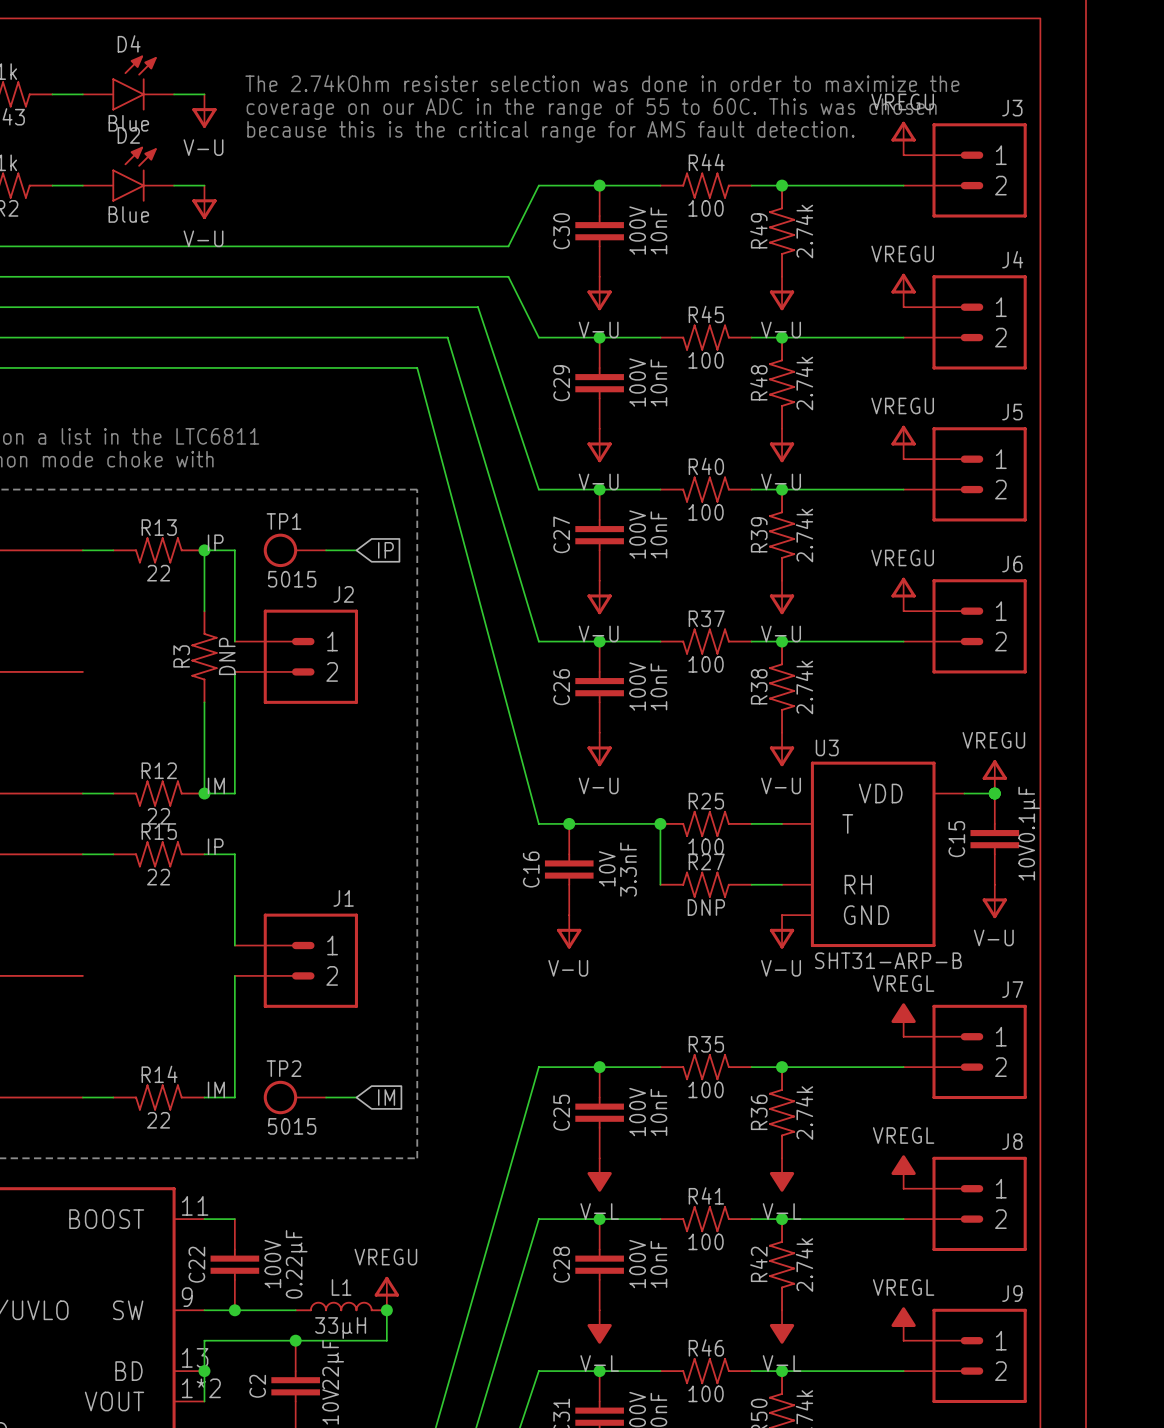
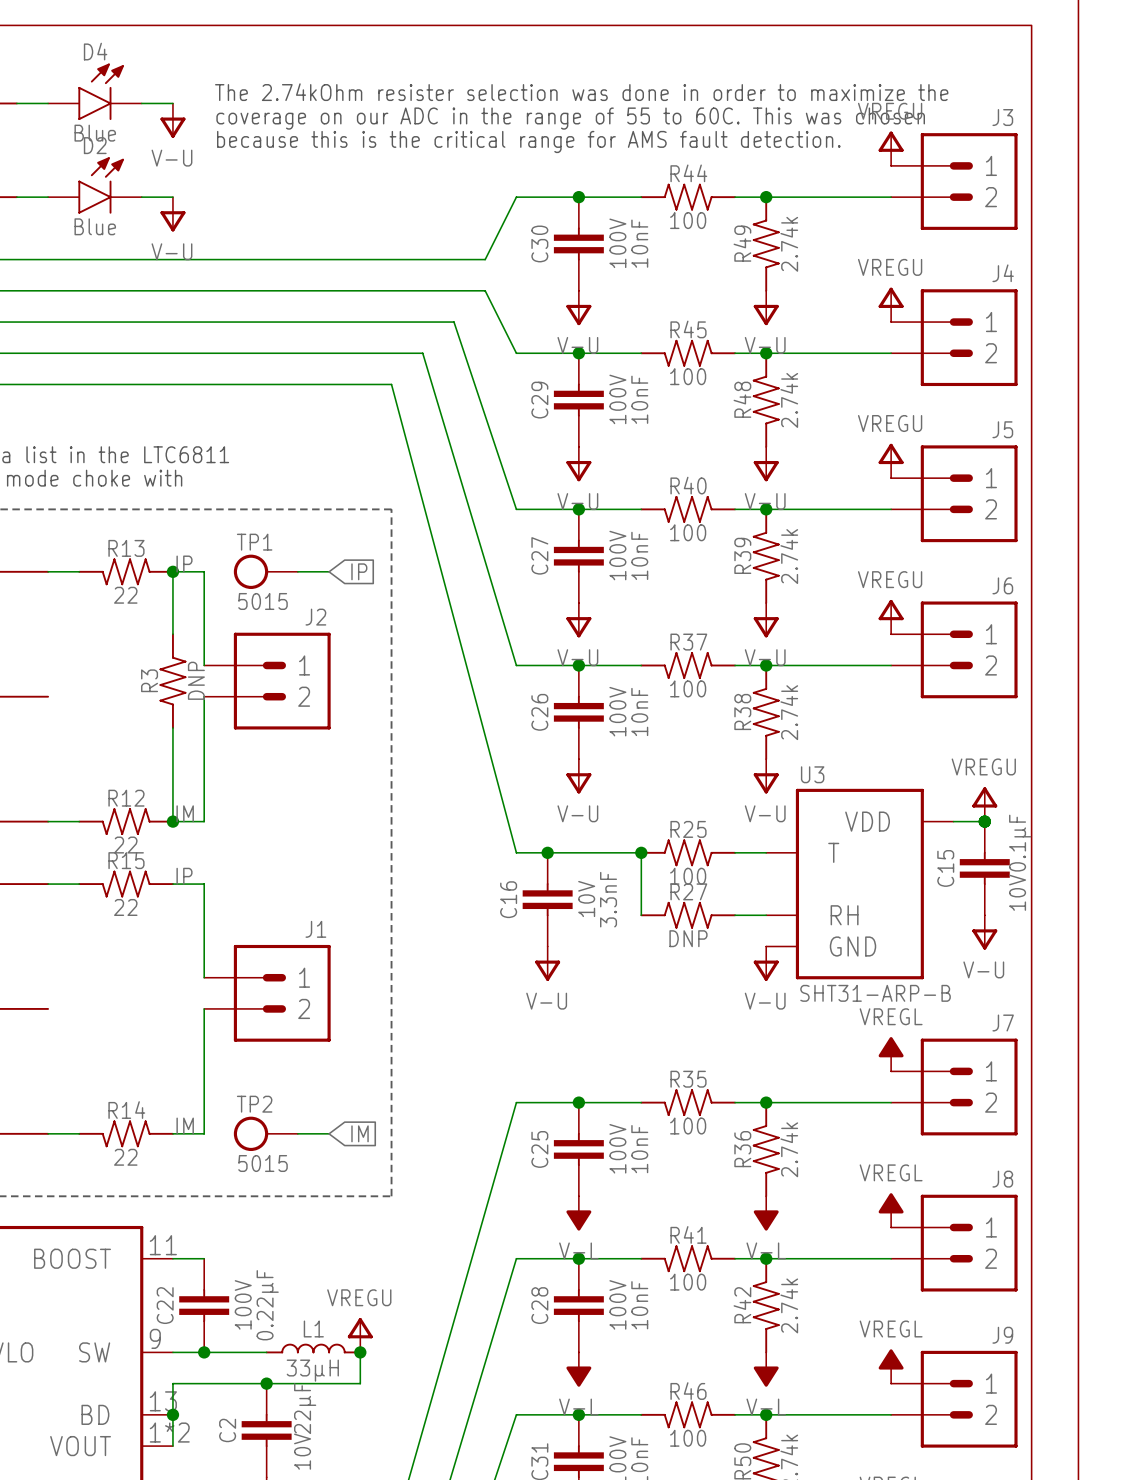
R25 flip: as is (706, 823) -> left-right (688, 852)

